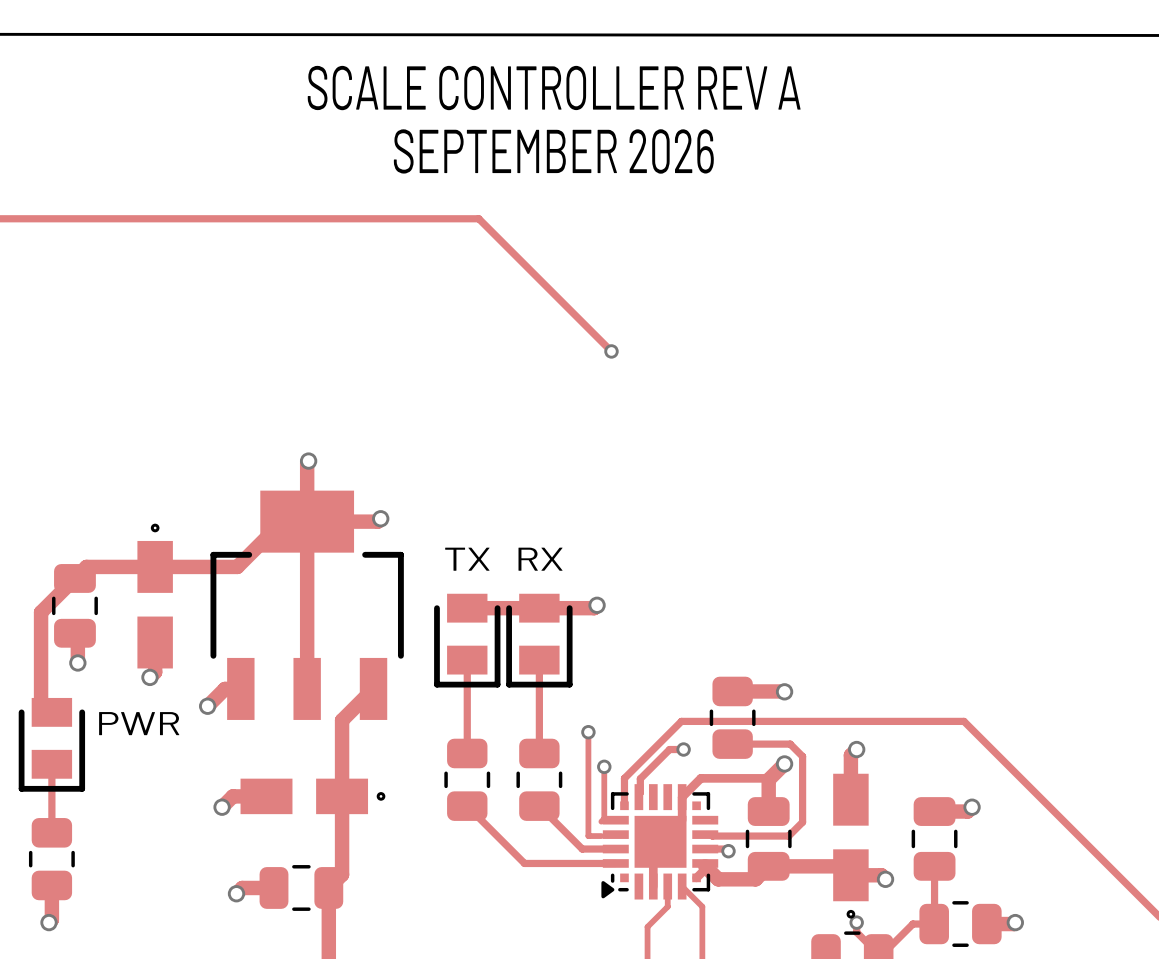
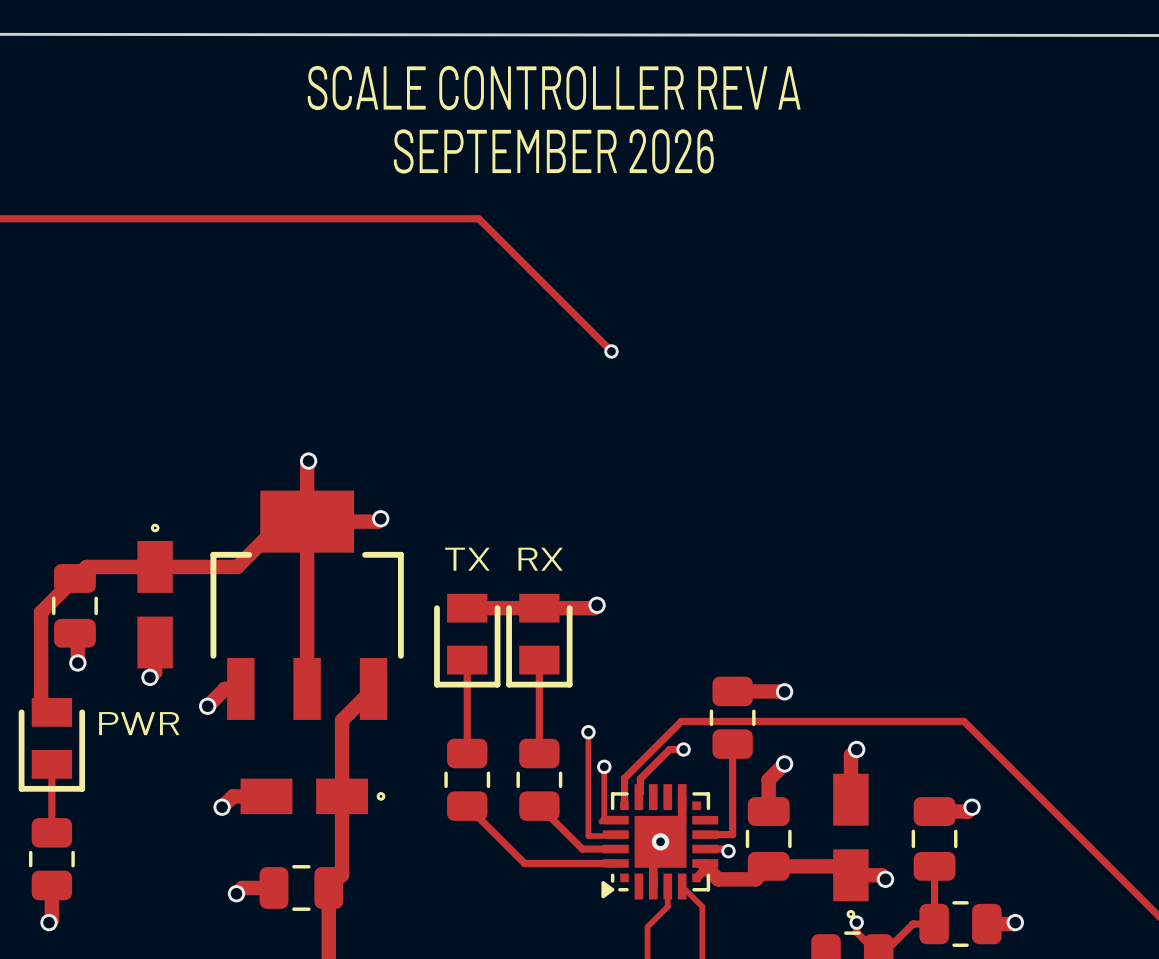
track: (732, 744) (790, 744) (802, 756) (802, 822) (788, 836) (711, 834) -> (732, 744) (732, 834) (705, 834)
track: (784, 763) (770, 778) (700, 778) (682, 797) -> none
via: none -> (660, 841)

